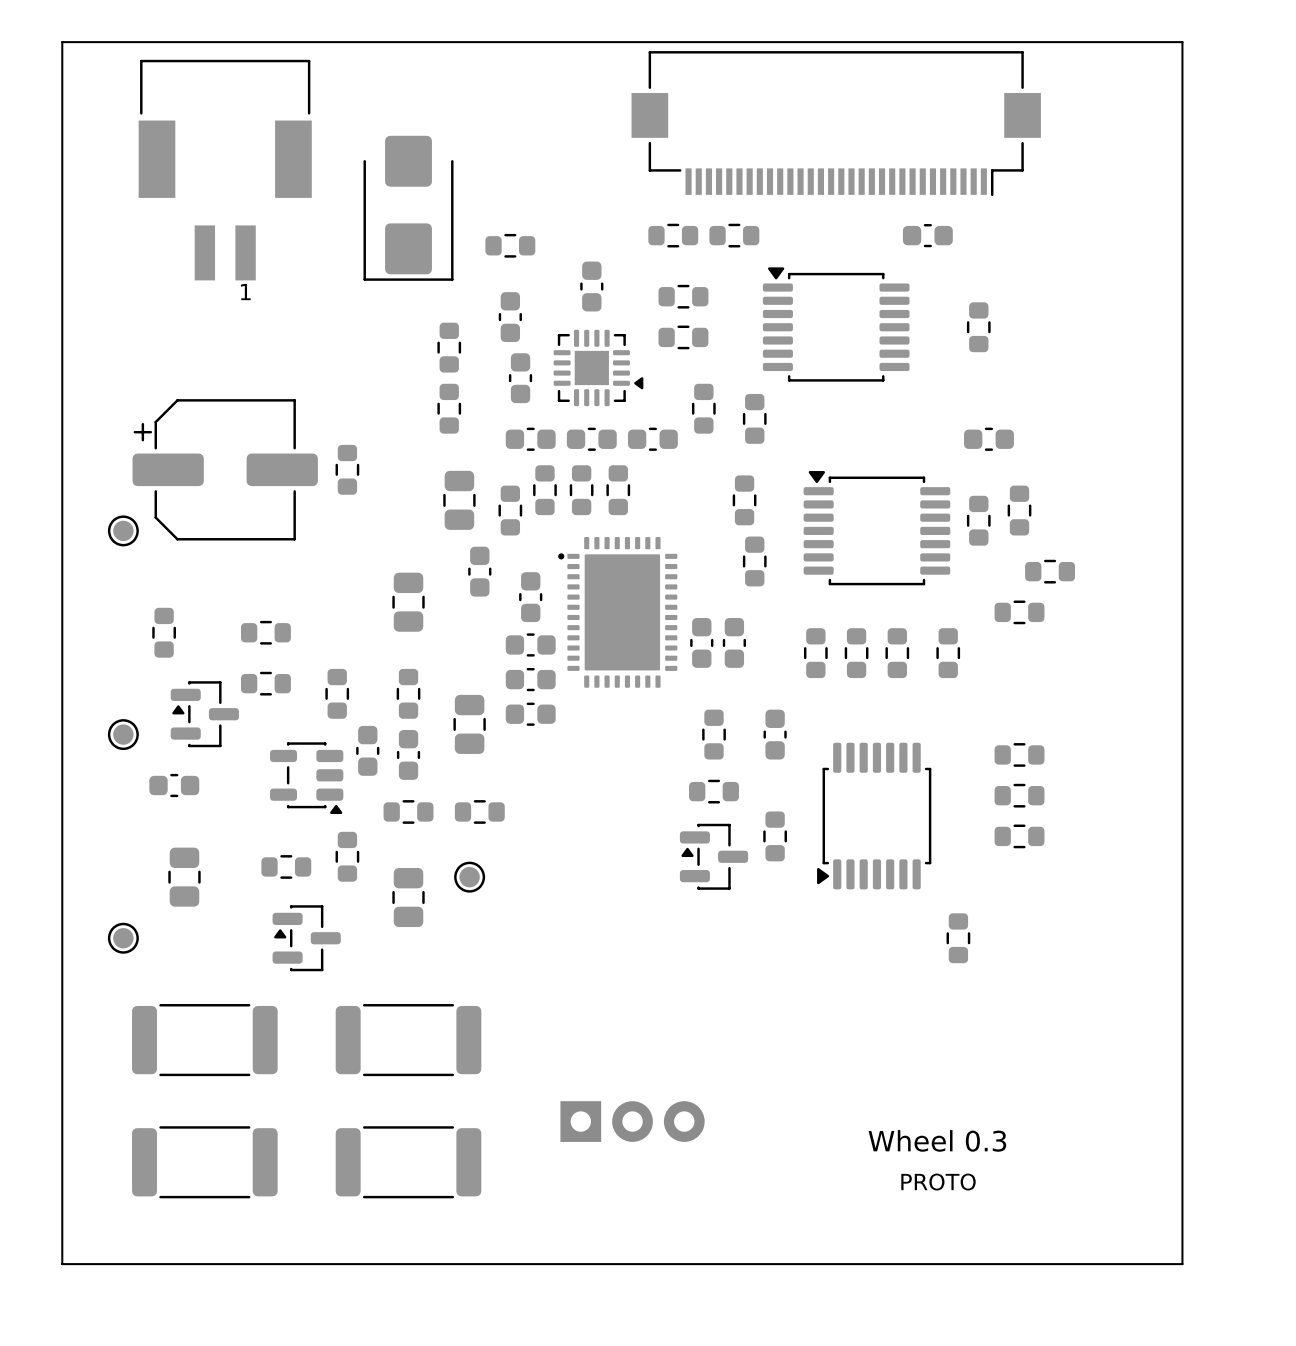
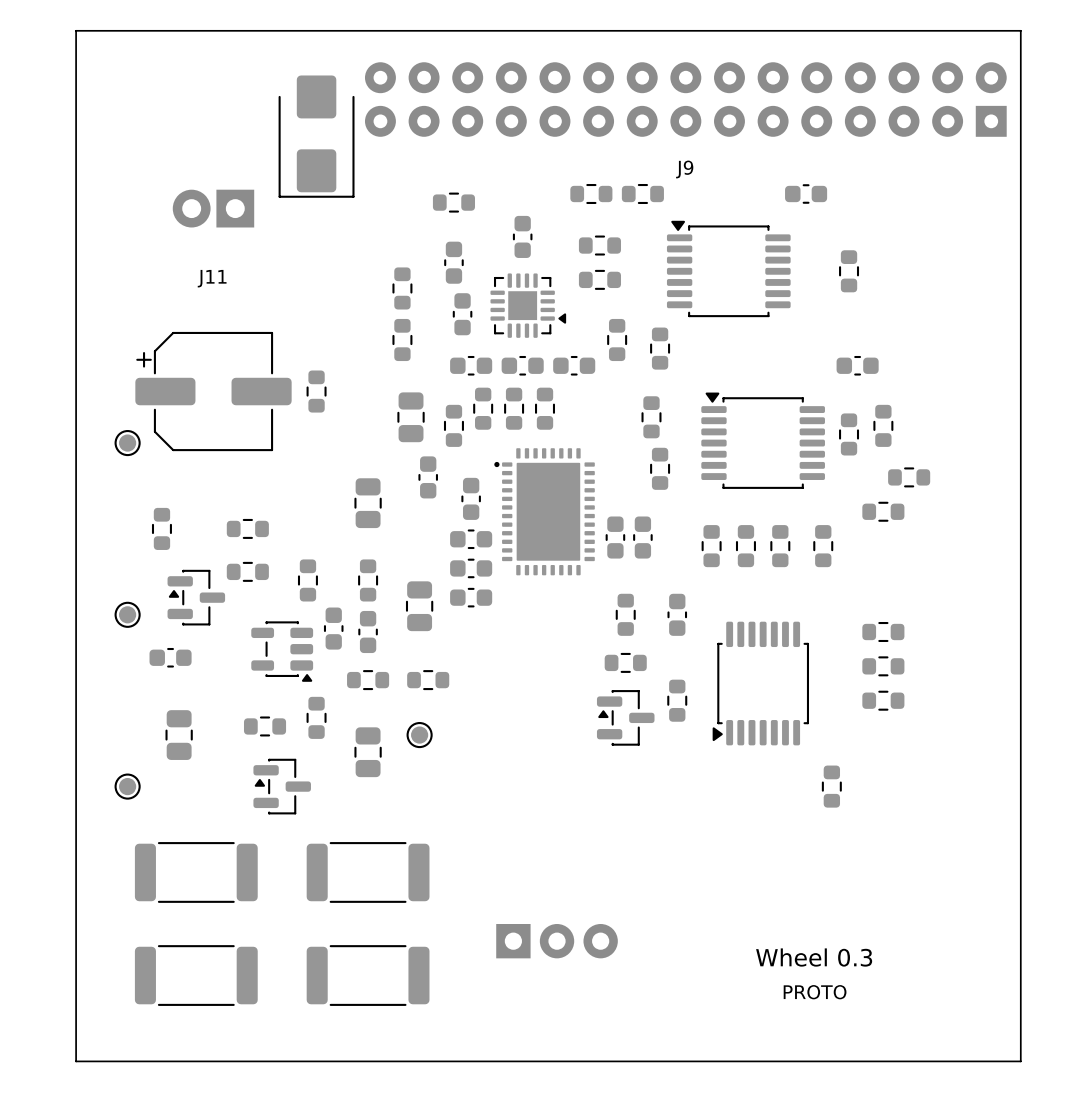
J9: none -> (685, 99)
part: (836, 123) -> none
part: (225, 170) -> none
part position: (408, 208) -> (316, 136)
J11: none -> (213, 208)

